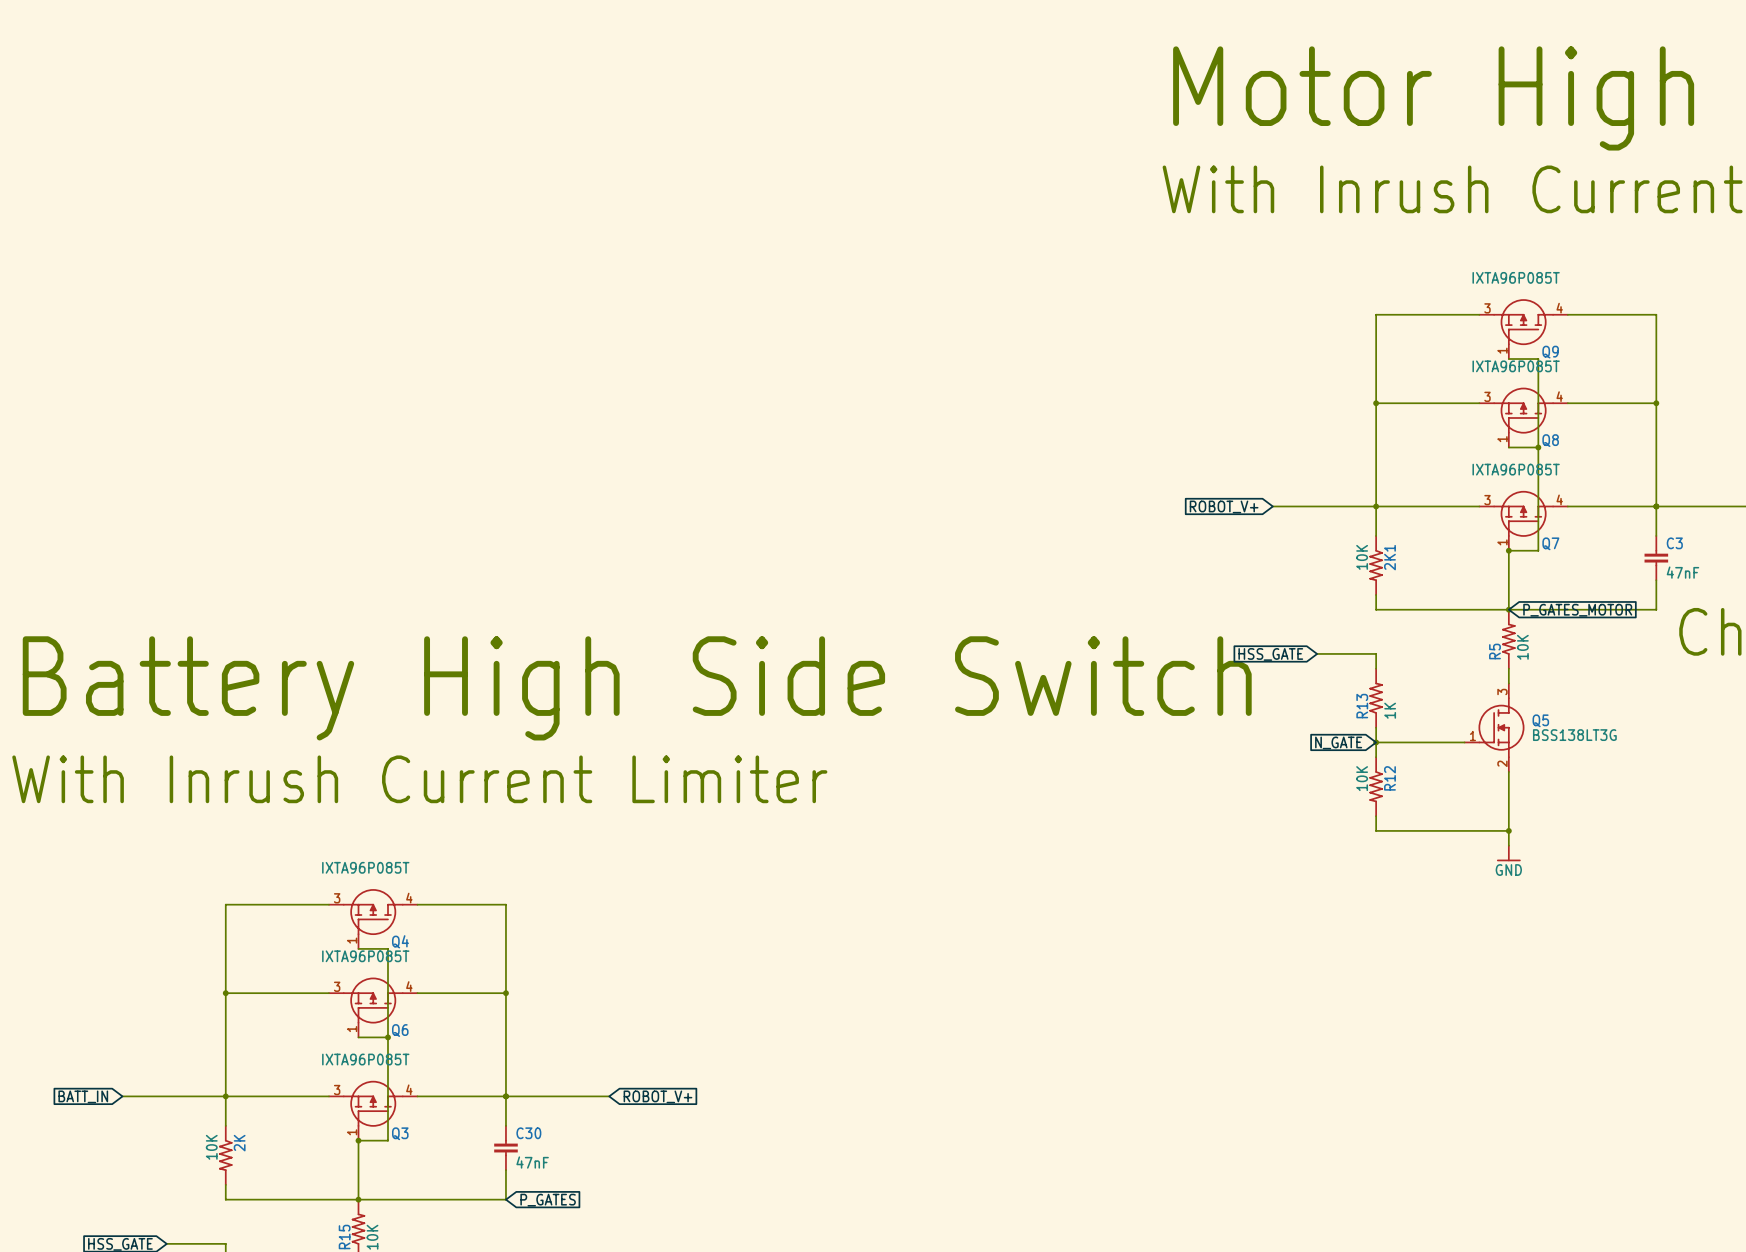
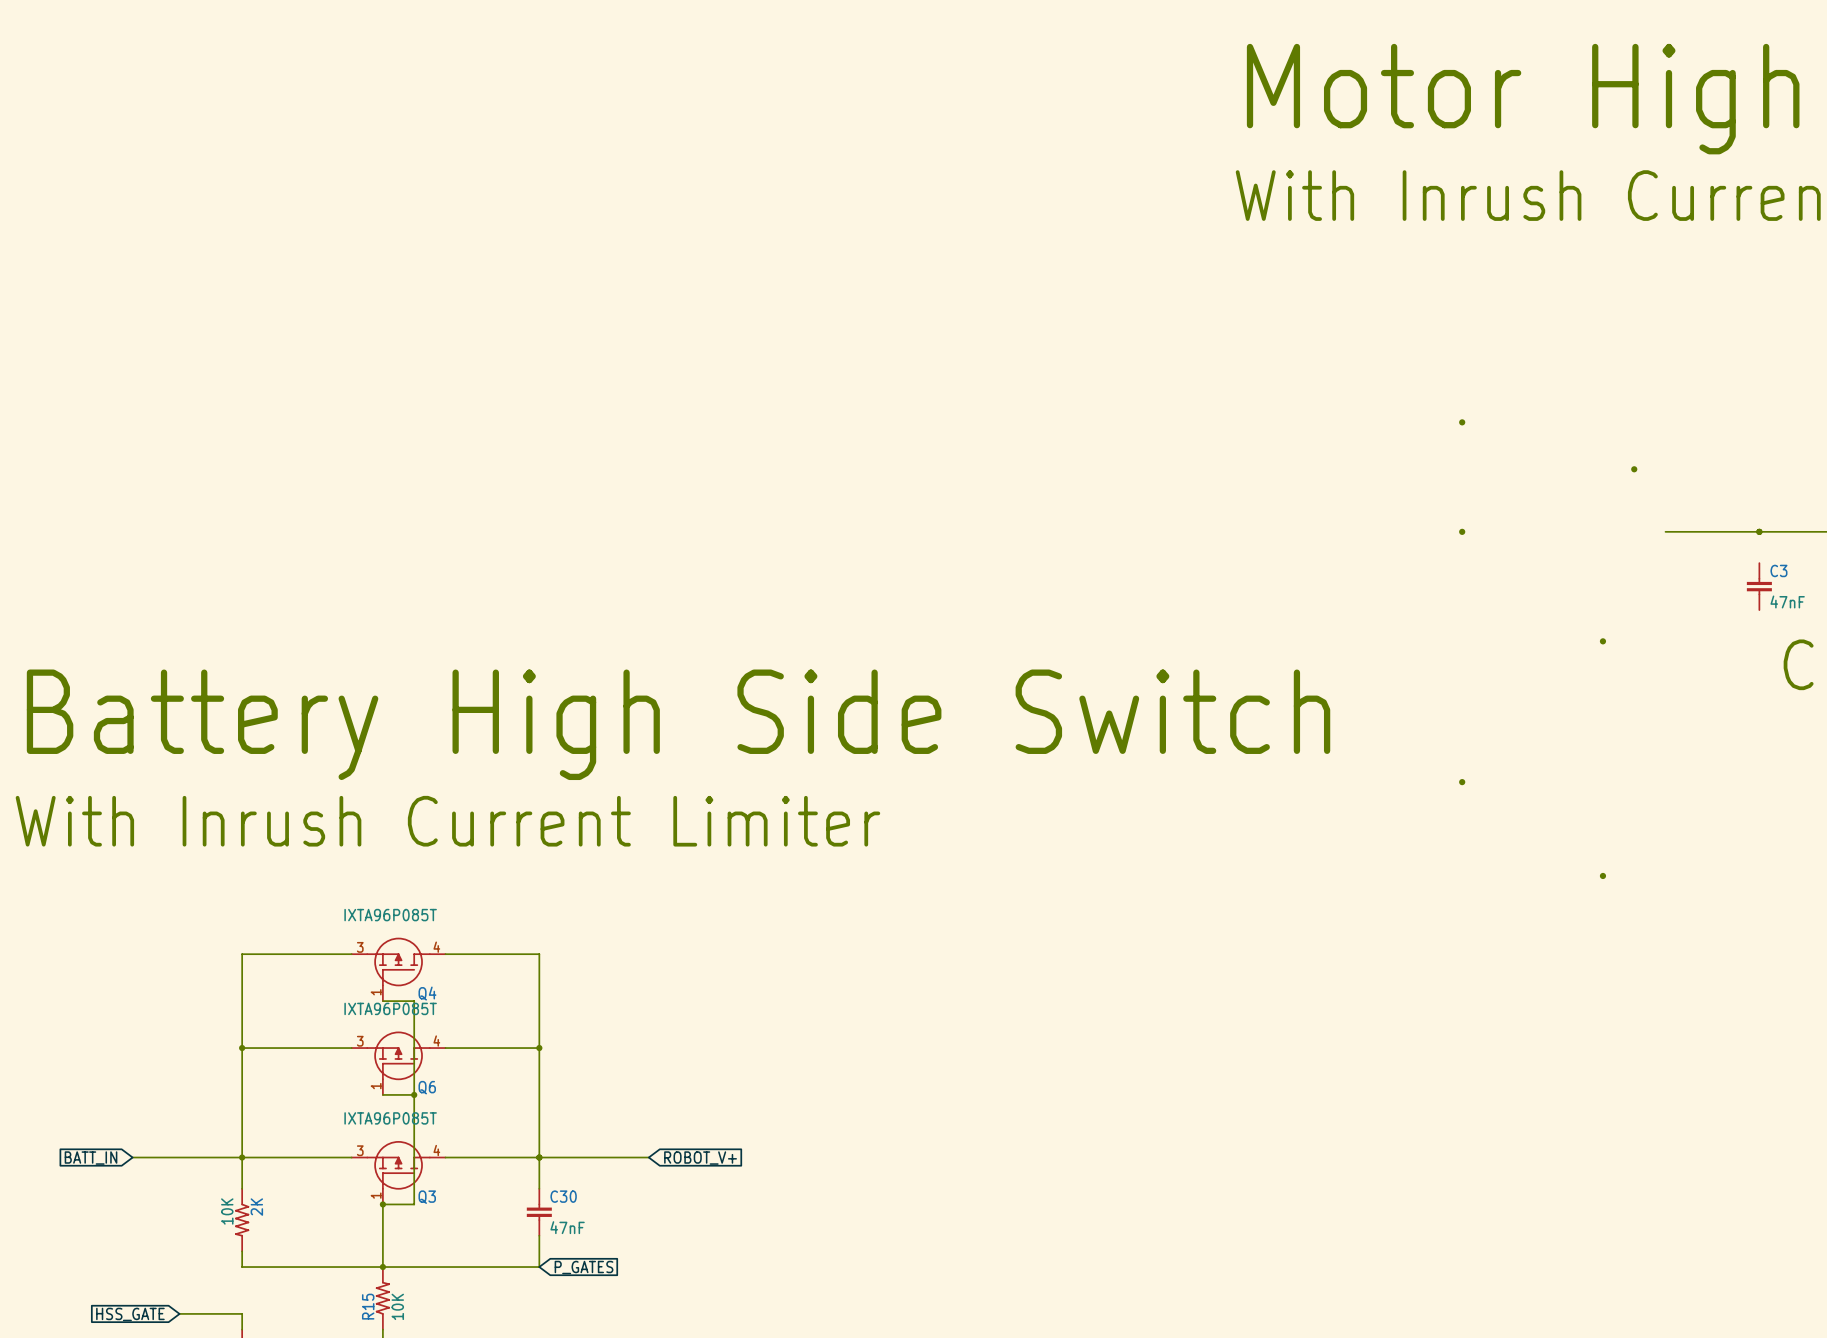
wire: (1479, 314) (1376, 314) (1376, 535) -> none
wire: (1567, 314) (1656, 314) (1656, 535) -> none
Q9: IXTA96P085T (1523, 329) -> none
wire: (1508, 359) (1538, 359) (1538, 550) (1508, 550) (1508, 609) -> none
wire: (1376, 403) (1479, 403) -> none
wire: (1567, 403) (1656, 403) -> none
junction: (1656, 403) -> none
Q8: IXTA96P085T (1523, 417) -> none
wire: (1508, 447) (1538, 447) -> none
global label: ROBOT_V+ (1224, 506) -> none
wire: (1272, 506) (1479, 506) -> none
Q7: IXTA96P085T (1523, 520) -> none
junction: (1508, 550) -> none
2K1: 10K (1376, 565) -> none
wire: (1656, 580) (1656, 609) (1376, 609) (1376, 594) -> none
global label: P_GATES_MOTOR (1577, 610) -> none
R5: 10K (1508, 639) -> none
wire: (1317, 653) (1376, 653) (1376, 668) -> none
global label: HSS_GATE (1270, 654) -> none
wire: (1508, 668) (1508, 683) -> none
R13: 1K (1376, 698) -> none
wire: (1376, 727) (1376, 757) -> none
Q5: BSS138LT3G (1494, 727) -> none
global label: N_GATE (1338, 742) -> none
wire: (1376, 742) (1464, 742) -> none
wire: (1508, 771) (1508, 845) -> none
R12: 10K (1376, 786) -> none
wire: (1376, 816) (1376, 830) (1508, 830) -> none
power symbol: GND (1508, 853) -> none

